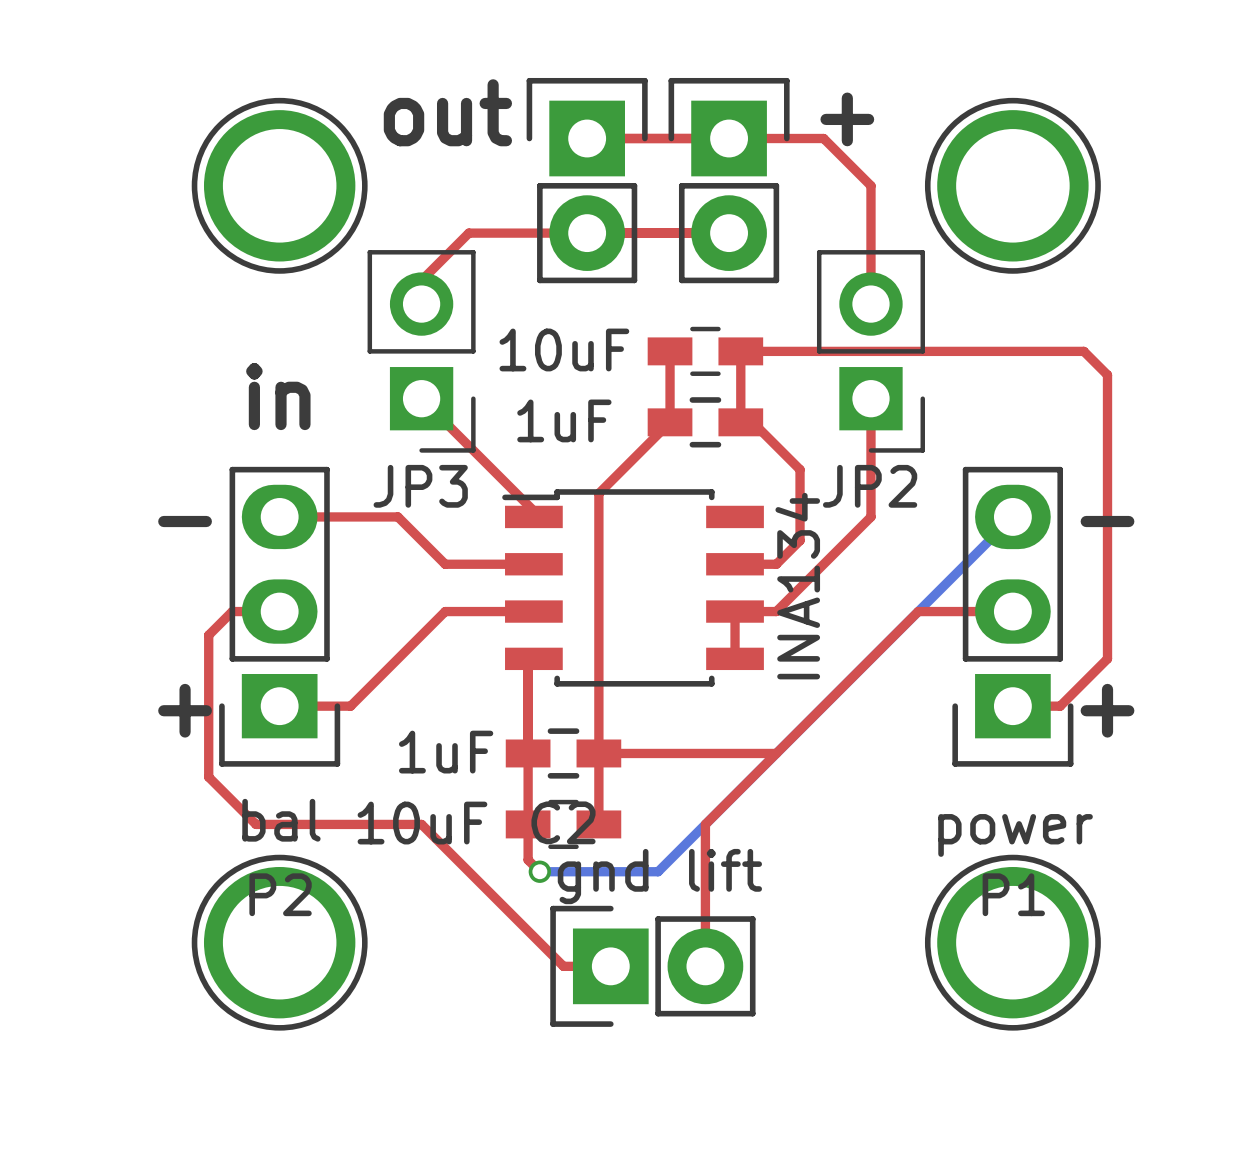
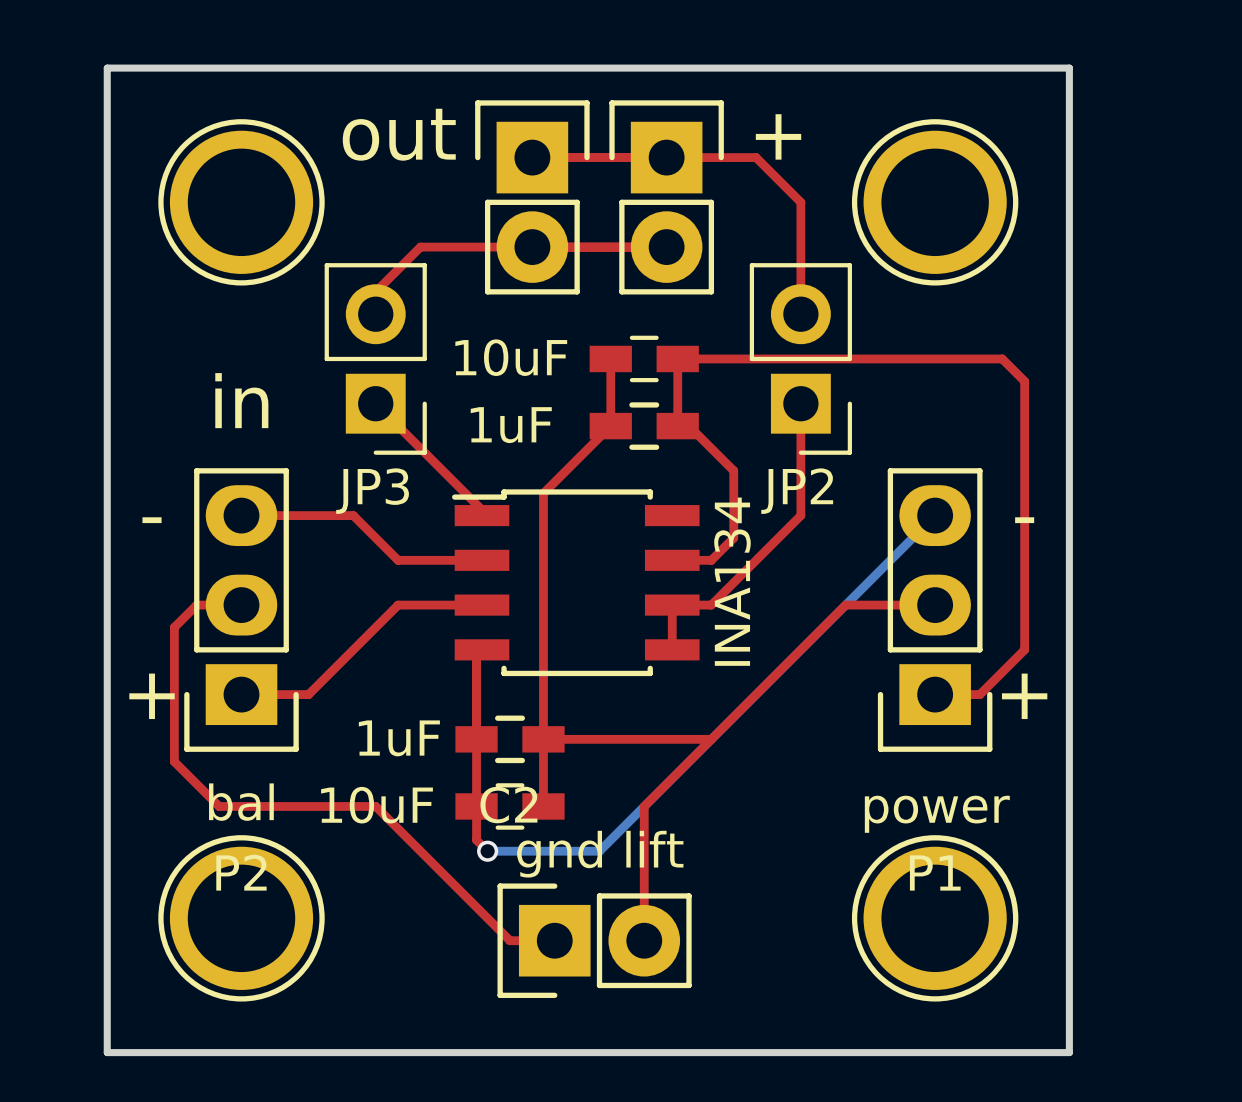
board edge: none -> (107, 68) (1069, 68) (1069, 1052) (107, 1052) (107, 68)

